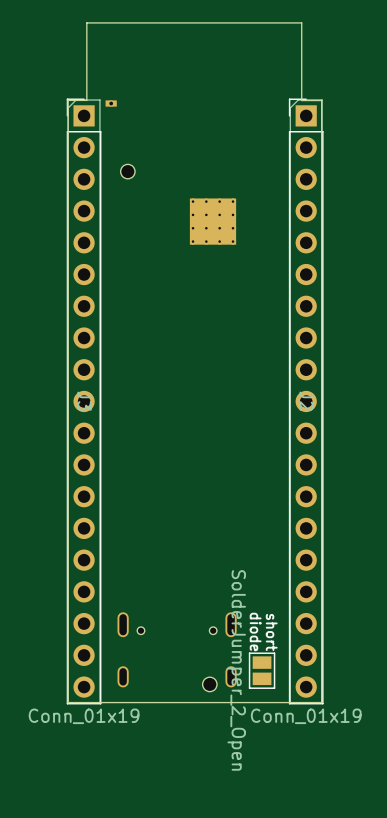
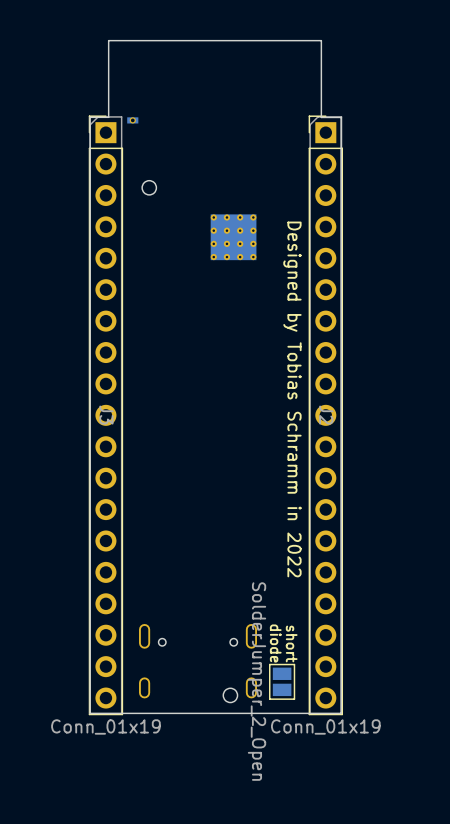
text: none -> Designed by Tobias Schramm in 2022 (292, 399)

